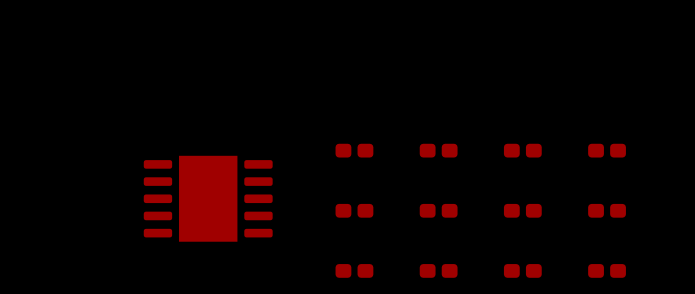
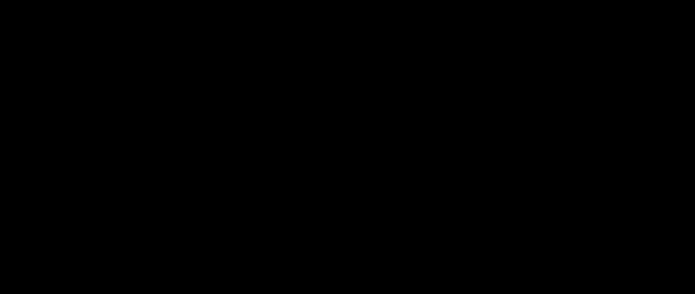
part: (354, 150) -> none
part: (438, 150) -> none
part: (522, 150) -> none
part: (607, 150) -> none
part: (208, 198) -> none
part: (354, 210) -> none
part: (438, 210) -> none
part: (522, 210) -> none
part: (607, 210) -> none
part: (354, 270) -> none
part: (438, 270) -> none
part: (522, 270) -> none
part: (607, 270) -> none

